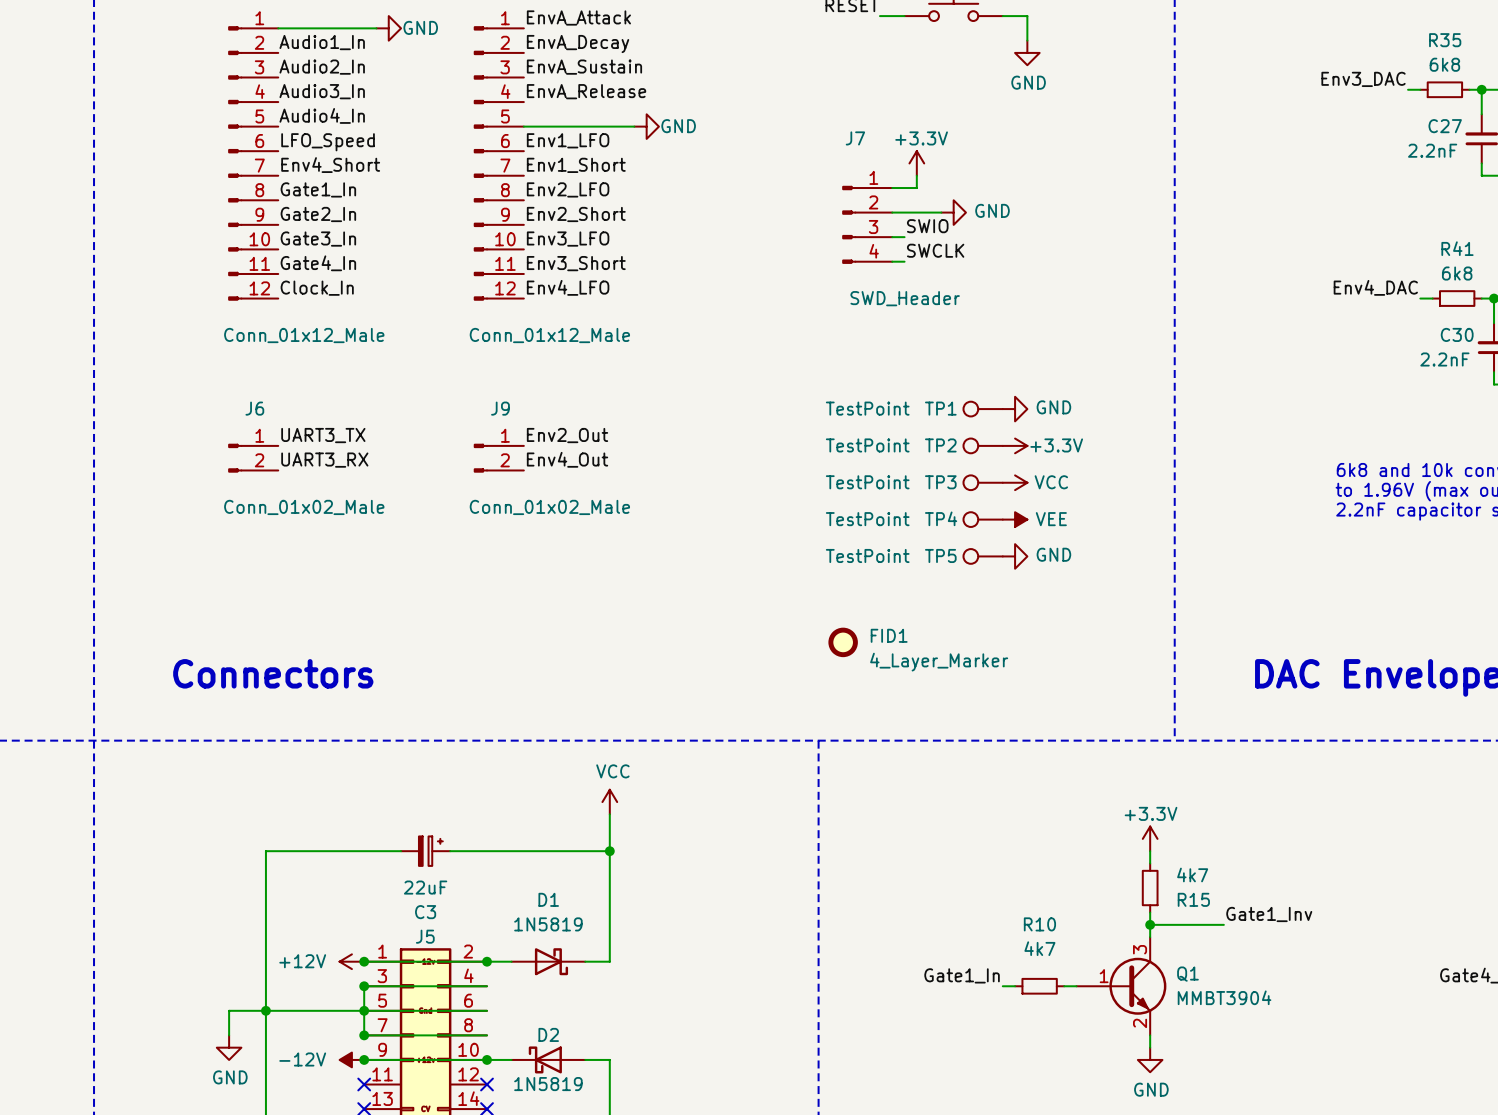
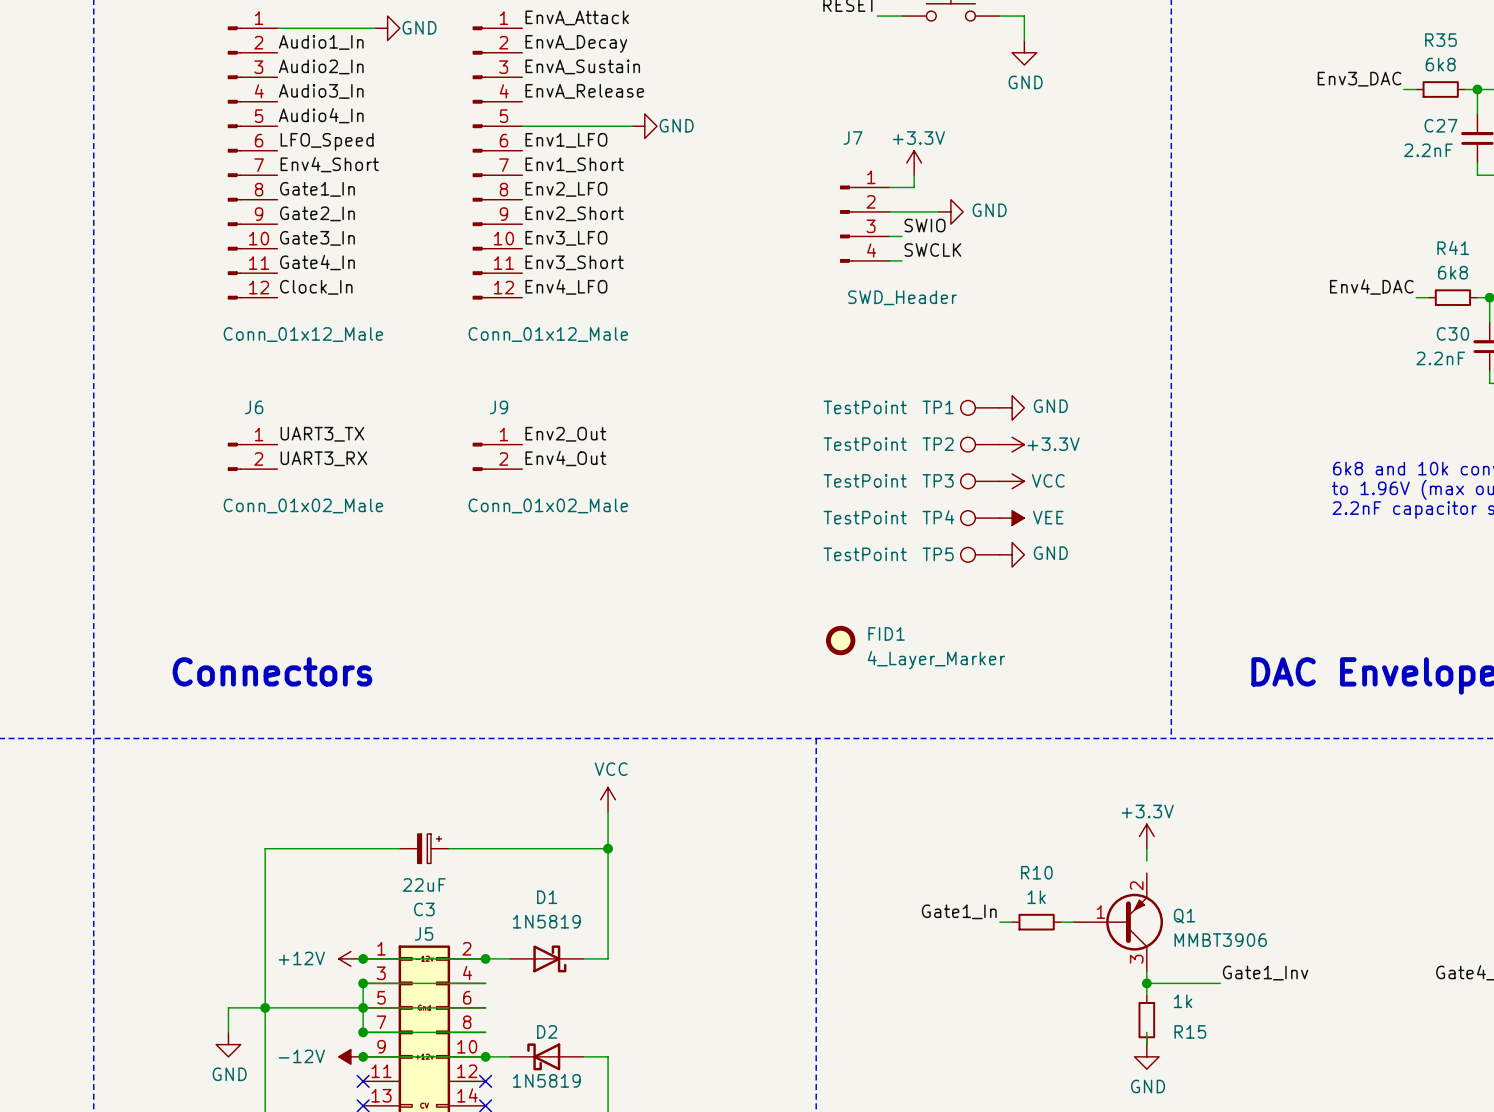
R15 value: 4k7 (1192, 874) -> 1k (1183, 1001)
R15 position: (1150, 888) -> (1146, 1020)
wire: (1150, 912) (1150, 937) -> (1146, 971) (1146, 995)
label position: Gate1_Inv (1269, 914) -> Gate1_Inv (1265, 973)
R10 name position: R10 (1039, 924) -> R10 (1036, 872)
wire: (1150, 924) (1223, 924) -> (1146, 983) (1220, 983)
junction: (1150, 924) -> none
Q1 symbol: [1076, 937, 1167, 1036] -> [1073, 873, 1163, 972]
R10 value: 4k7 (1039, 948) -> 1k (1036, 897)
label position: Gate1_In (962, 975) -> Gate1_In (959, 911)
wire: (1002, 986) (1015, 986) -> (999, 922) (1012, 922)
R10 position: (1039, 986) -> (1036, 922)
wire: (1064, 986) (1076, 986) -> (1061, 922) (1073, 922)
junction: none -> (1146, 983)
Q1 value: MMBT3904 (1224, 997) -> MMBT3906 (1220, 940)

